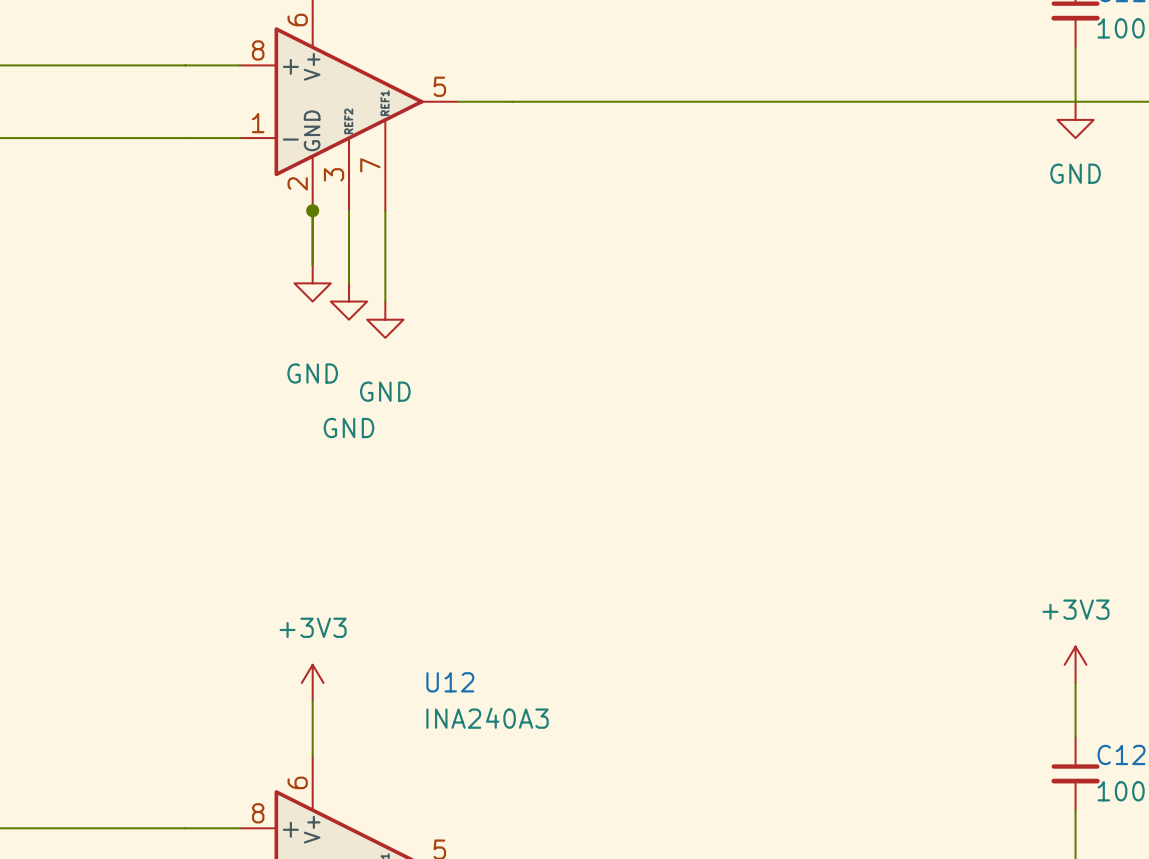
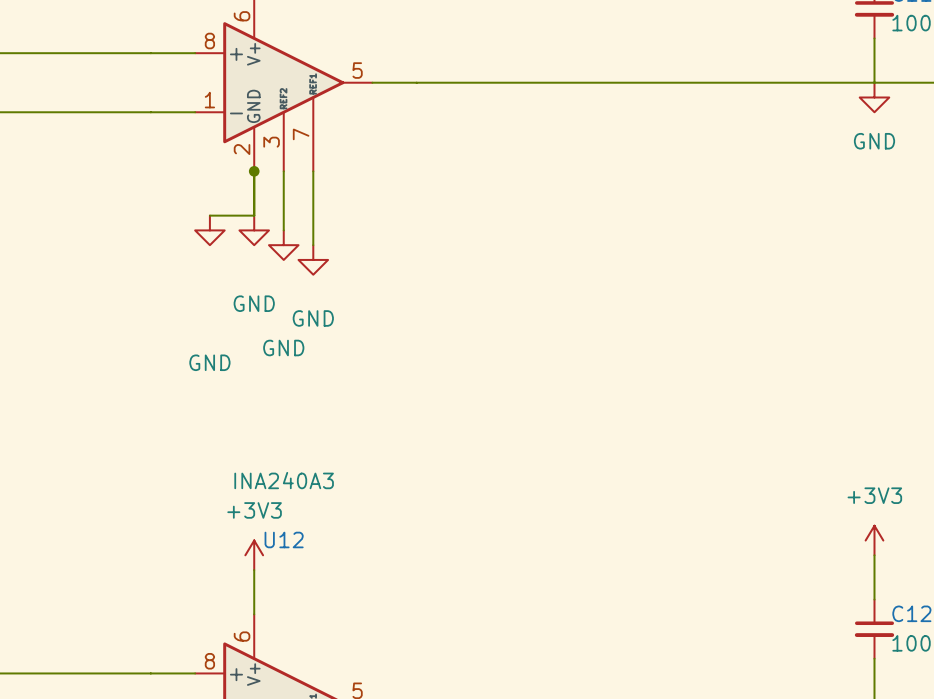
wire: none -> (209, 215) (254, 215)
power symbol: none -> GND (209, 230)
U12 name position: U12 (450, 682) -> U12 (284, 539)
U12 value position: INA240A3 (487, 718) -> INA240A3 (284, 480)

